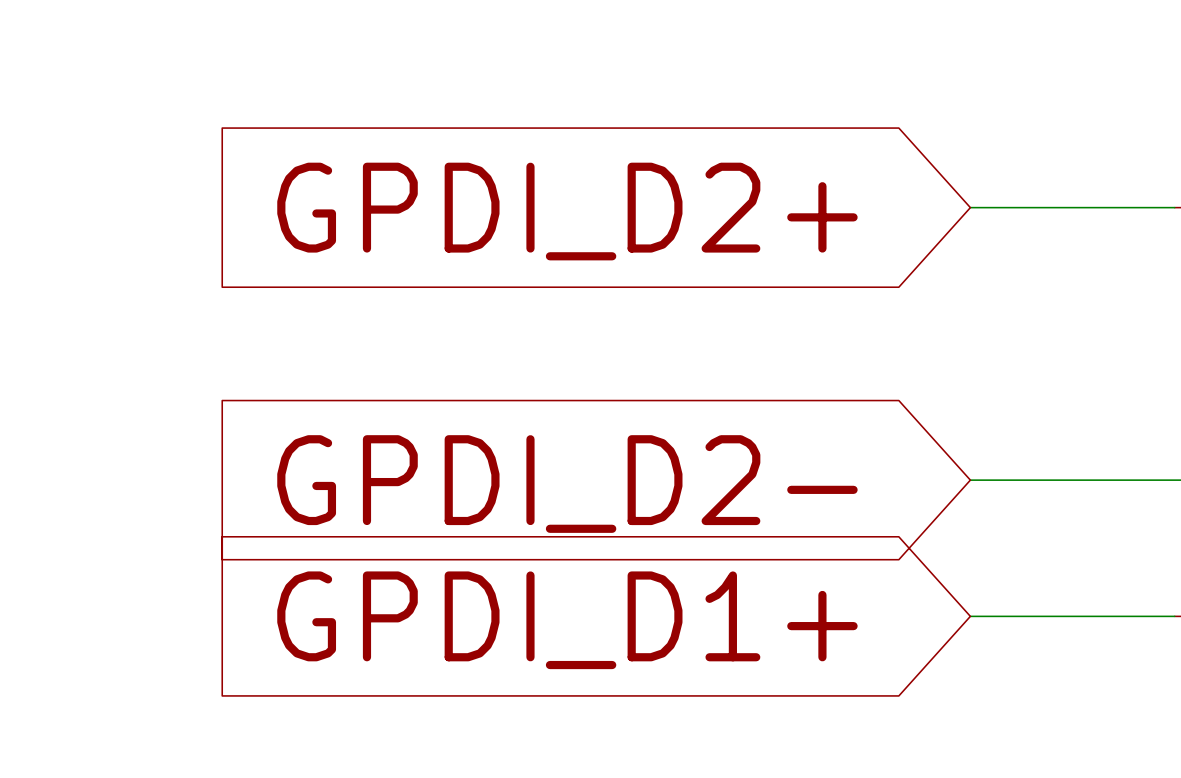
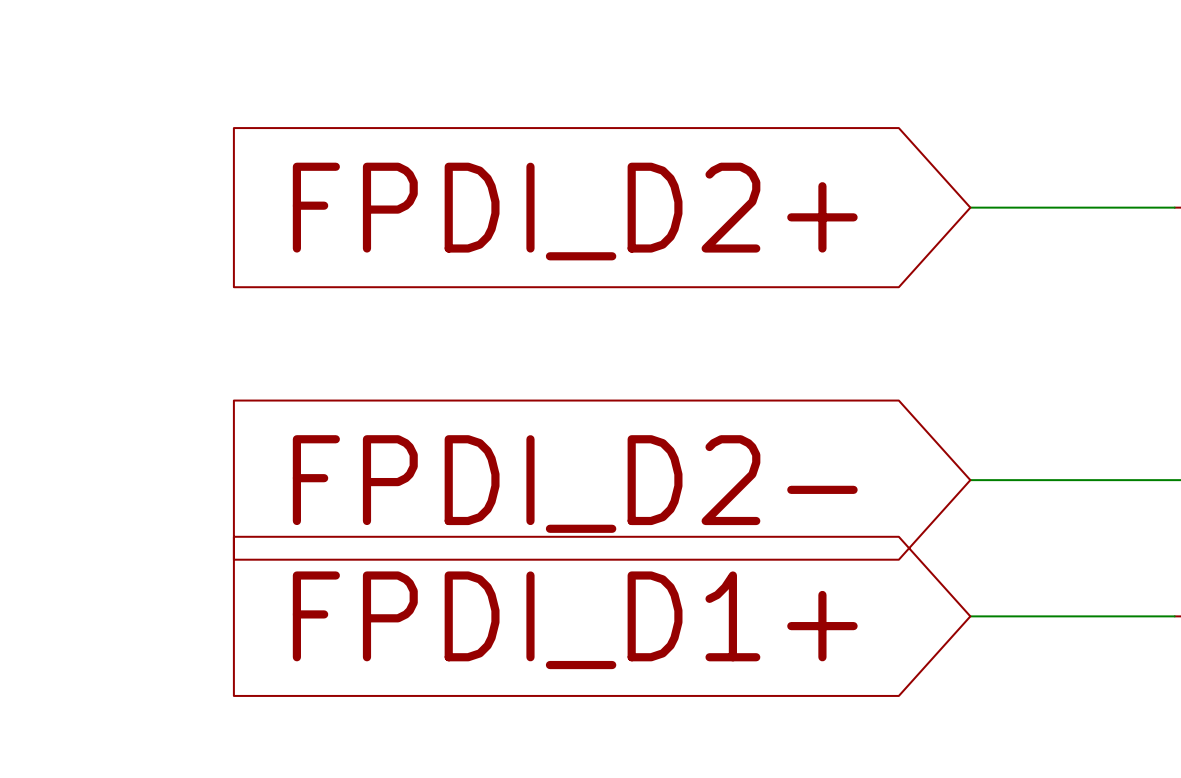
global label: GPDI_D2+ (567, 211) -> FPDI_D2+ (575, 211)
global label: GPDI_D2- (567, 484) -> FPDI_D2- (575, 484)
global label: GPDI_D1+ (567, 620) -> FPDI_D1+ (575, 620)

